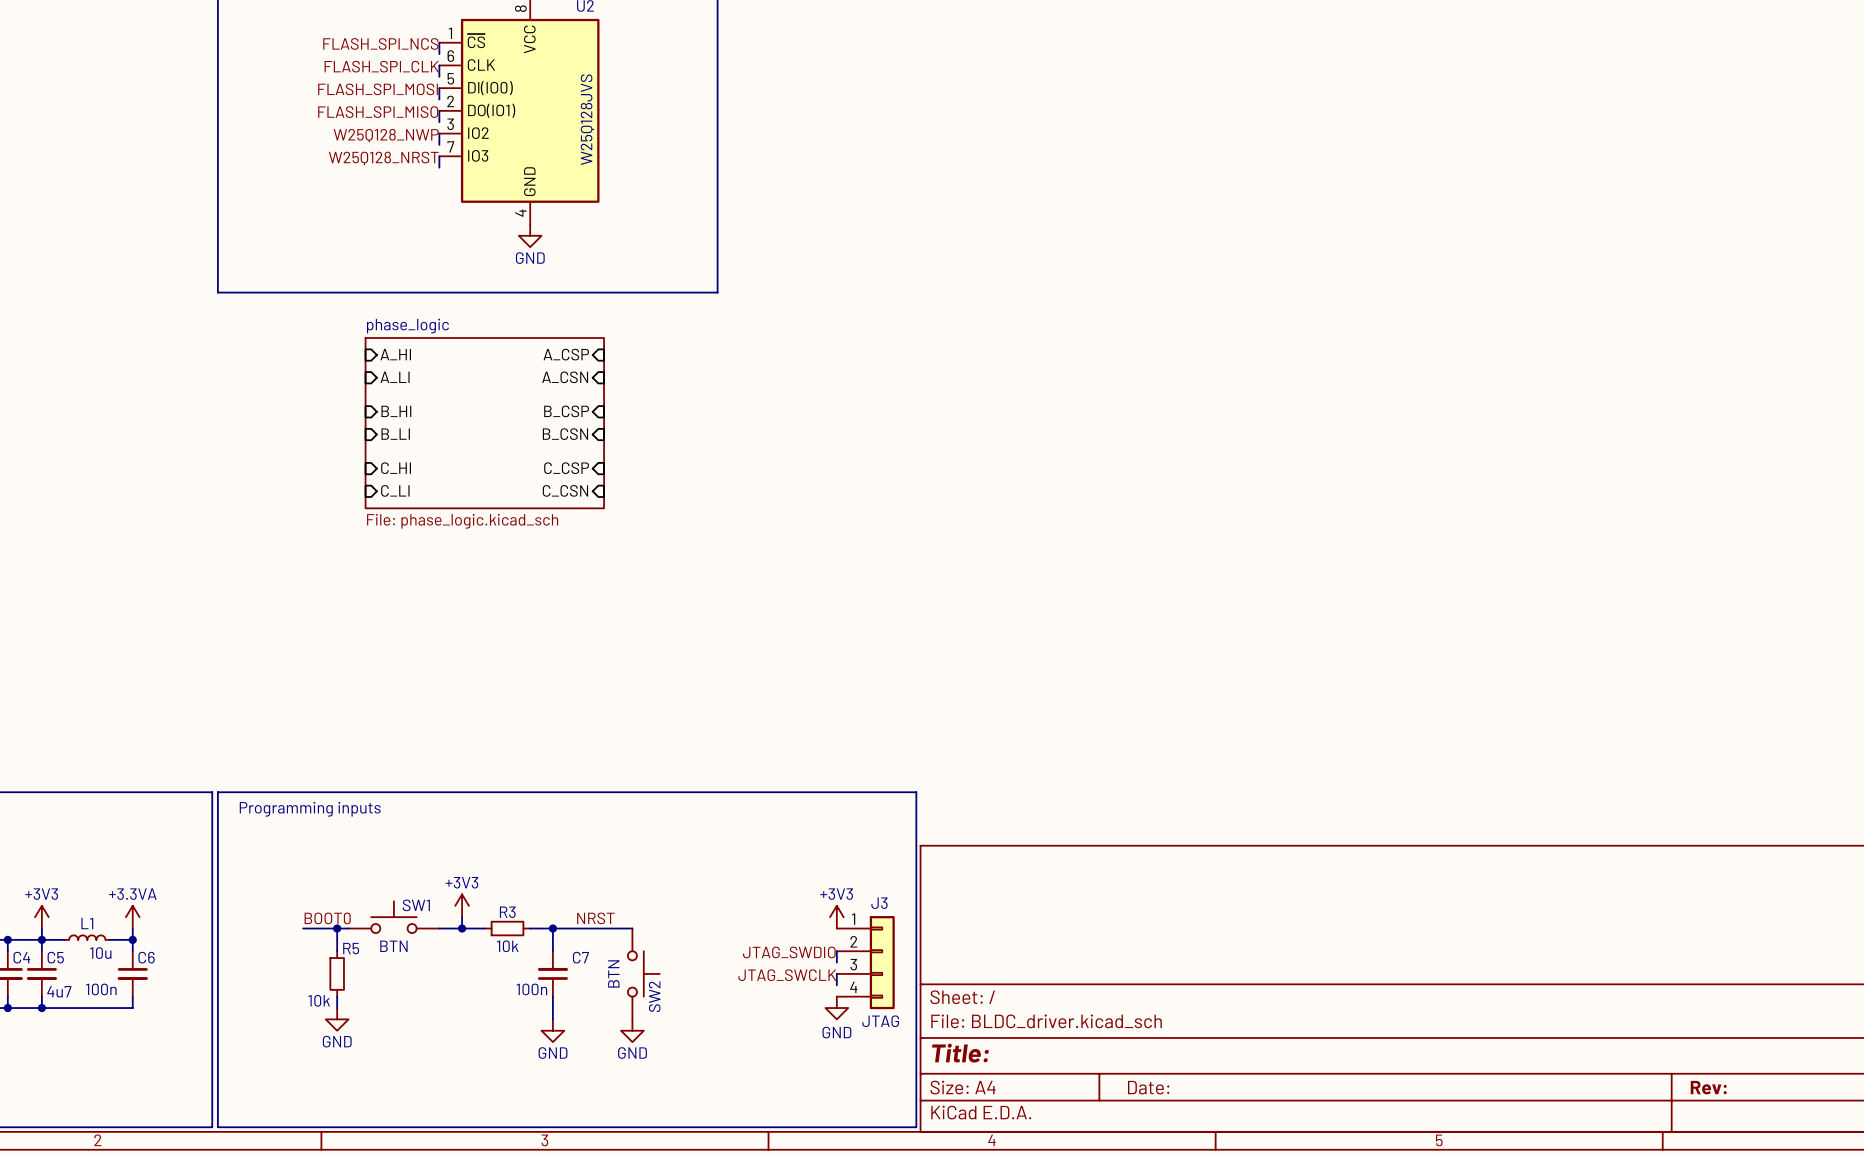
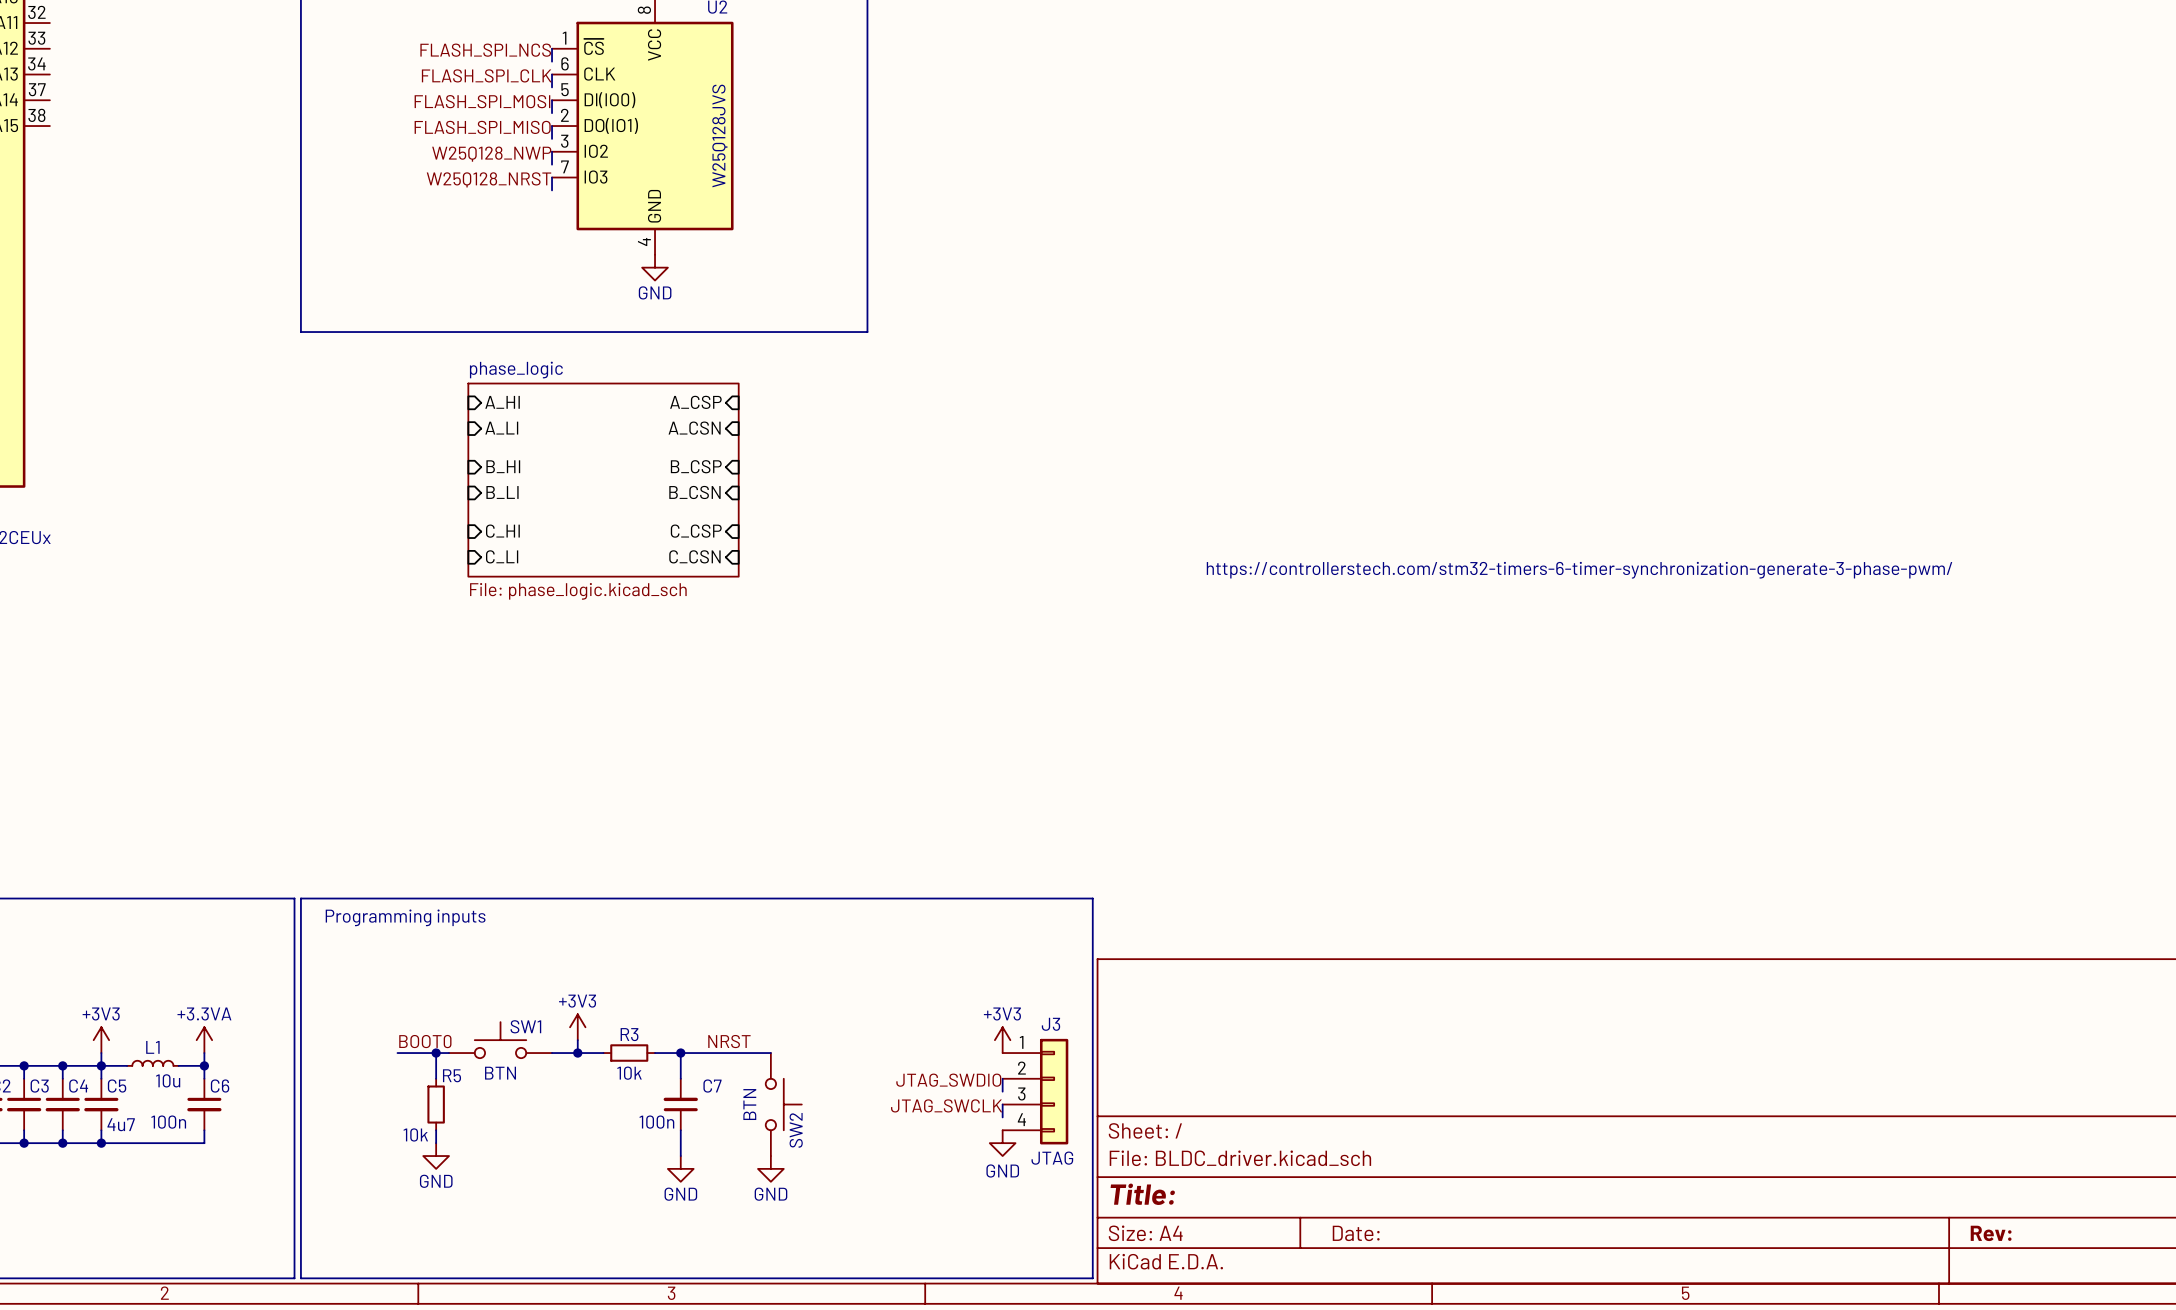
text: none -> https://controllerstech.com/stm32-timers-6-timer-synchronization-generate-3-phase-pwm/ (1579, 570)

